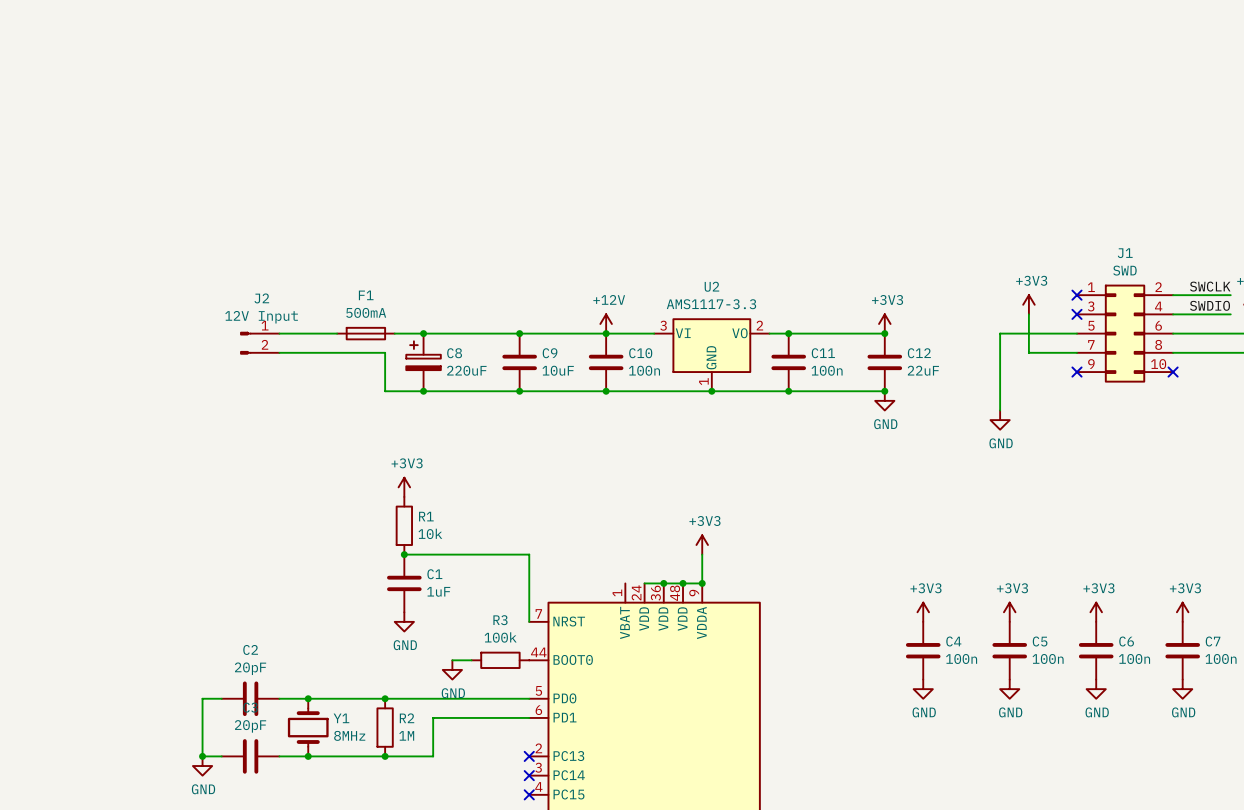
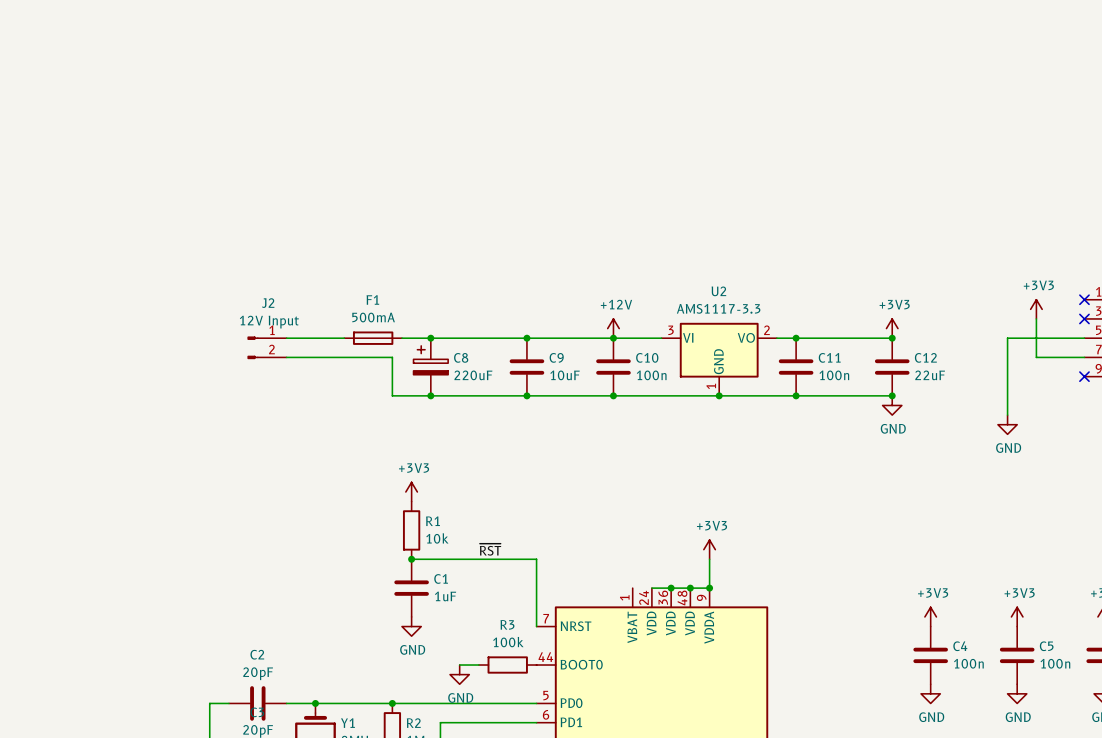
label: none -> ~{RST} (490, 549)

